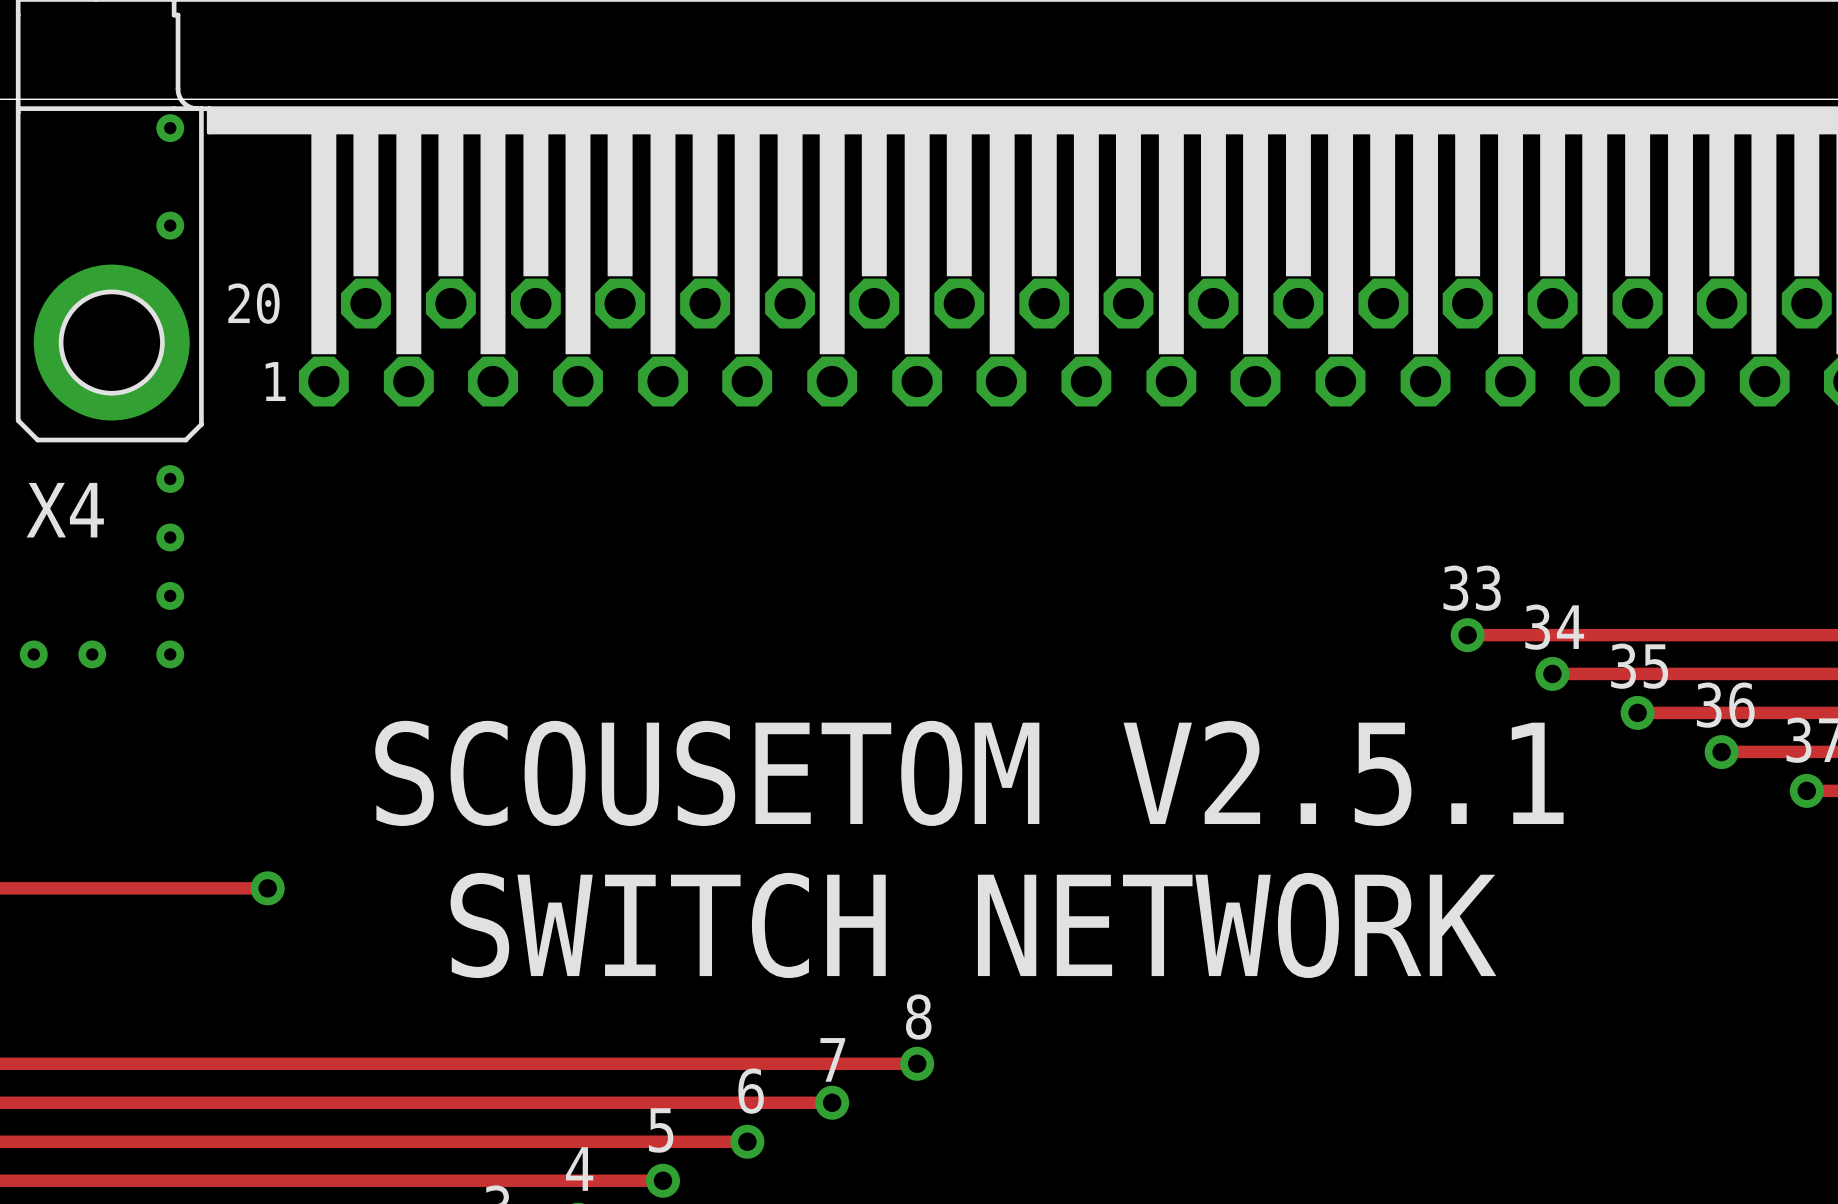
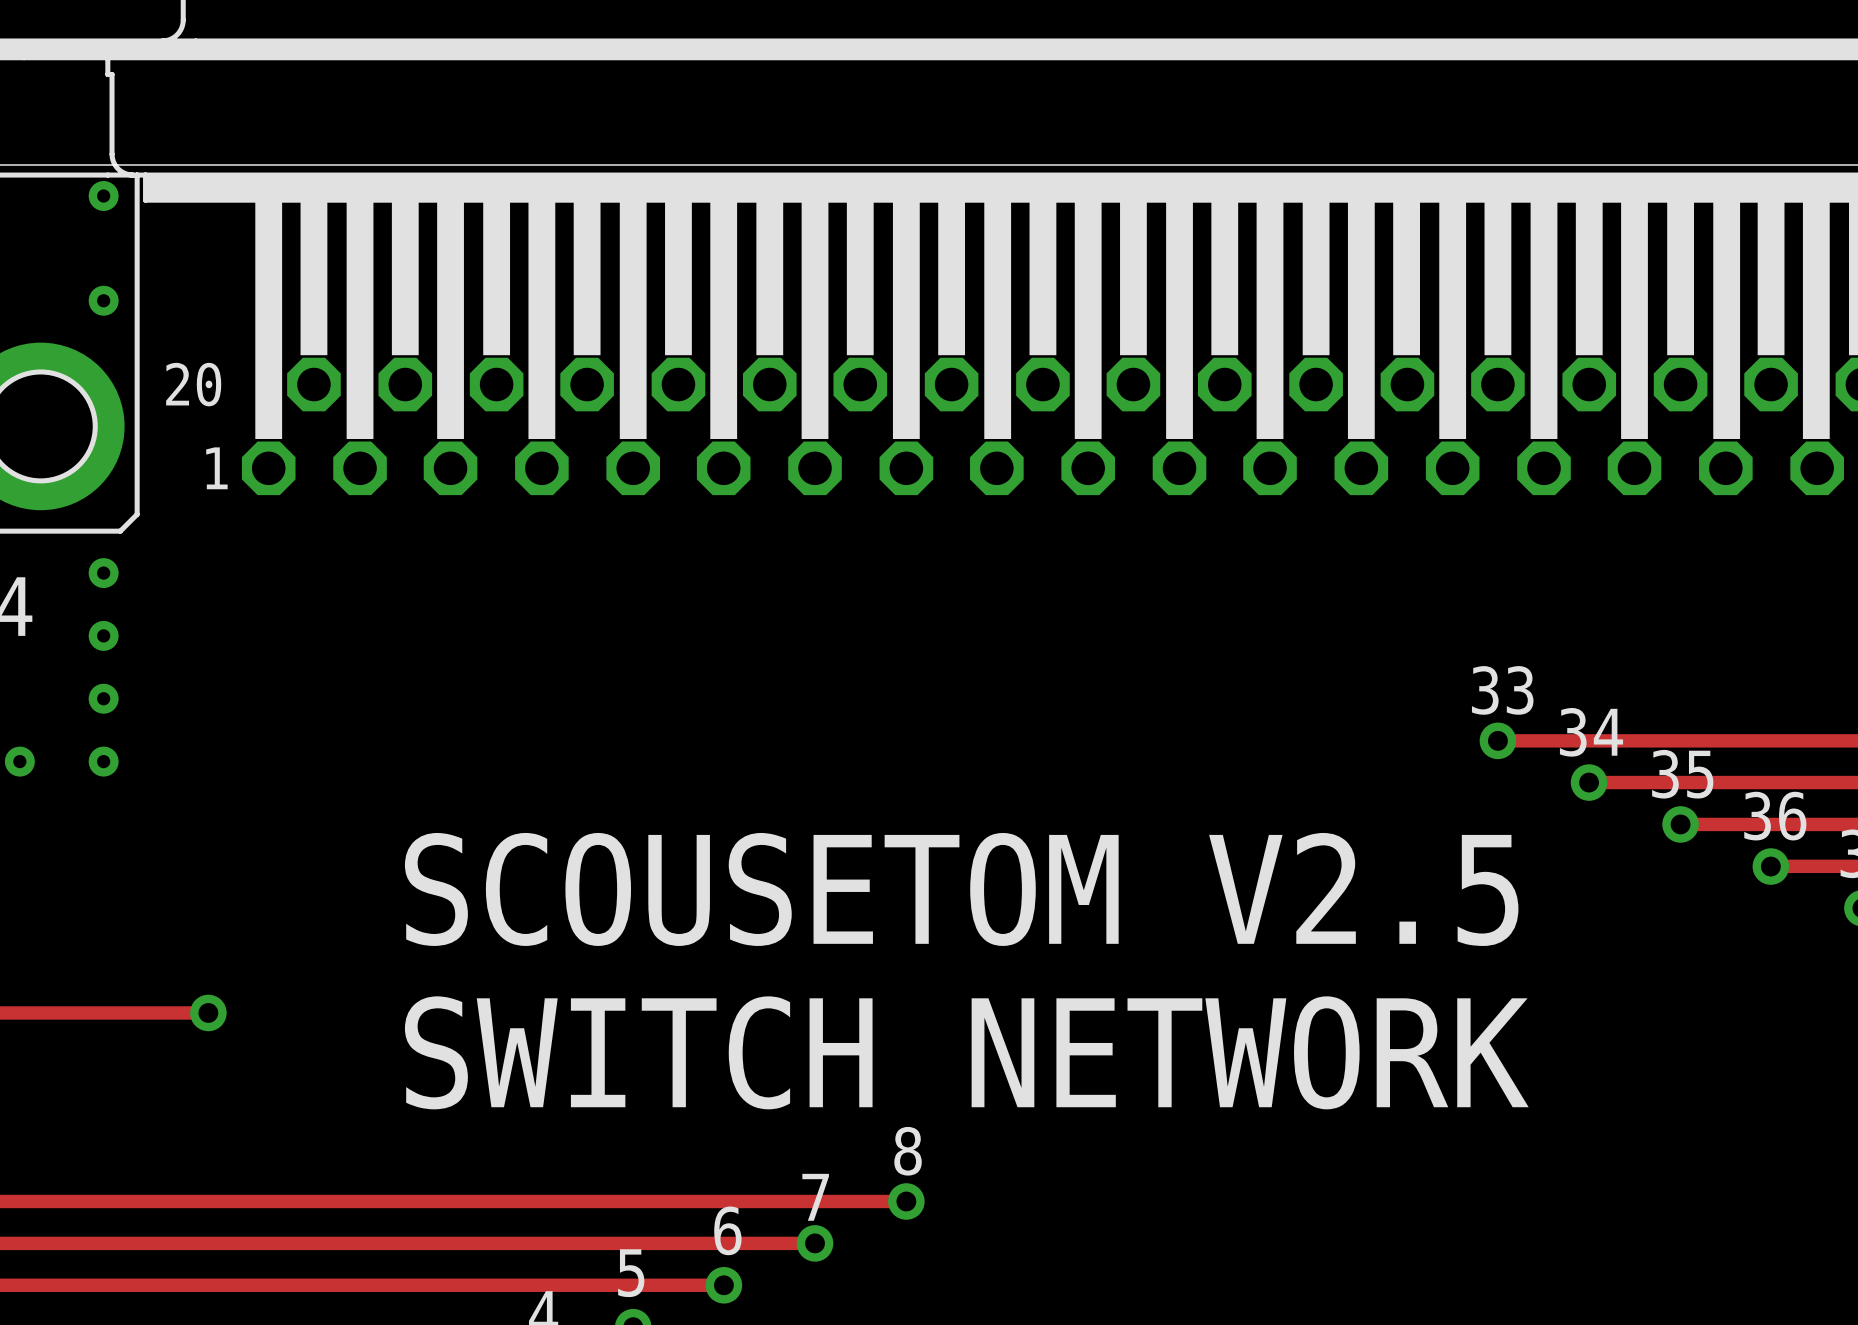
text: SCOUSETOM V2.5.1 (969, 773) -> SCOUSETOM V2.5 (961, 889)

